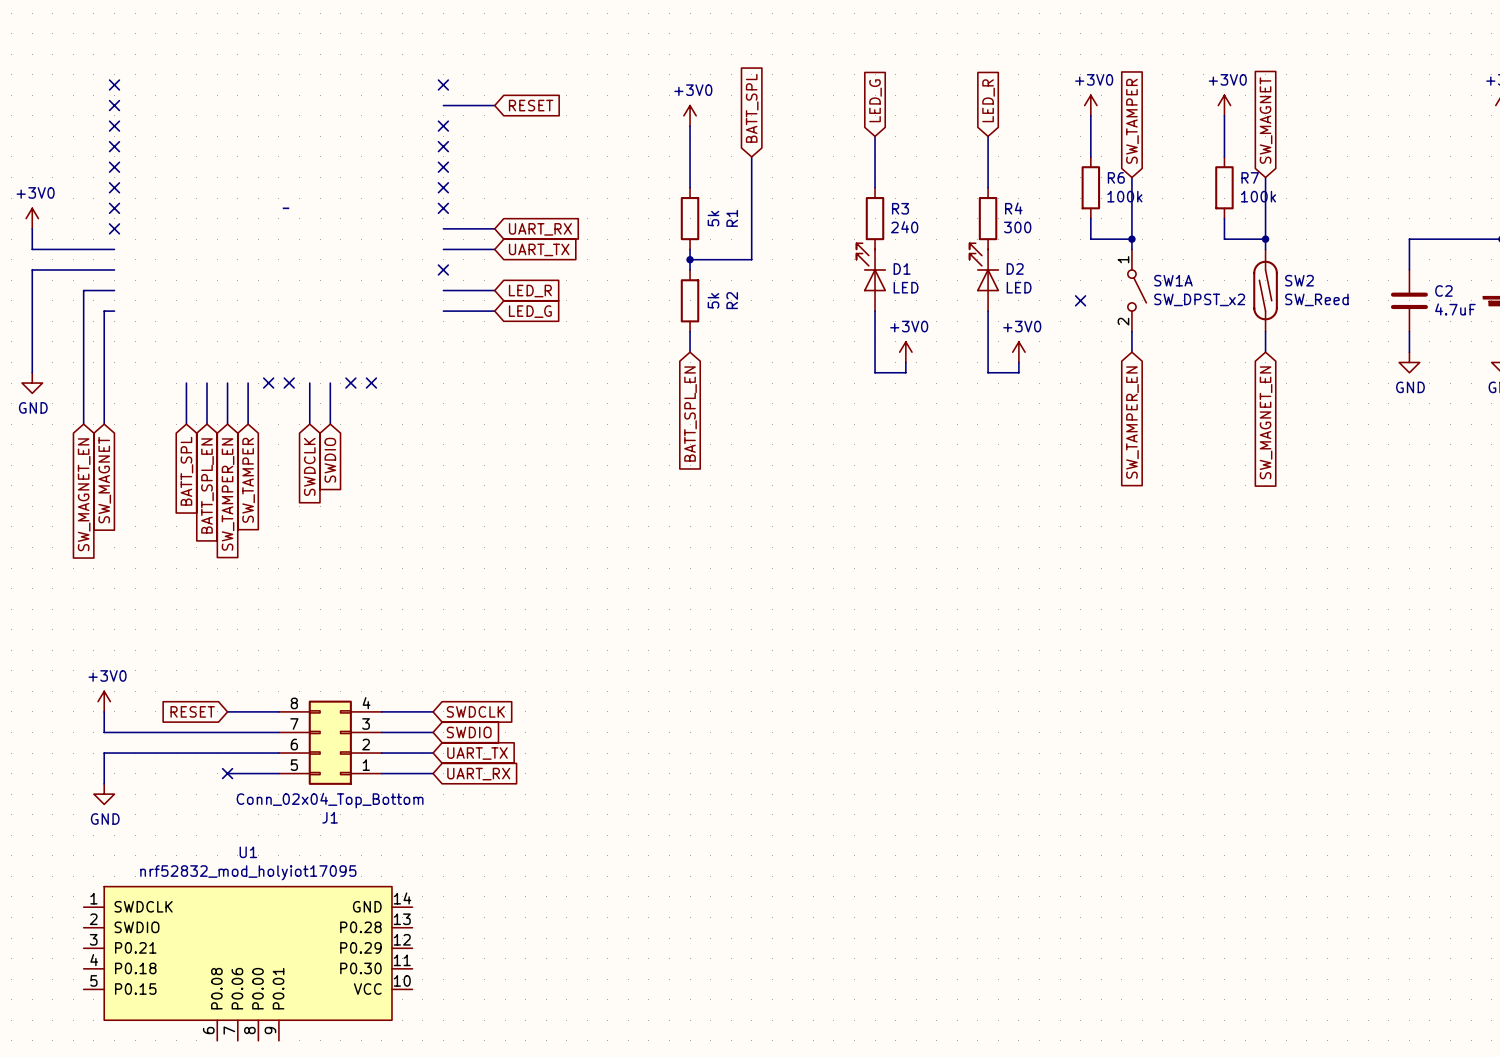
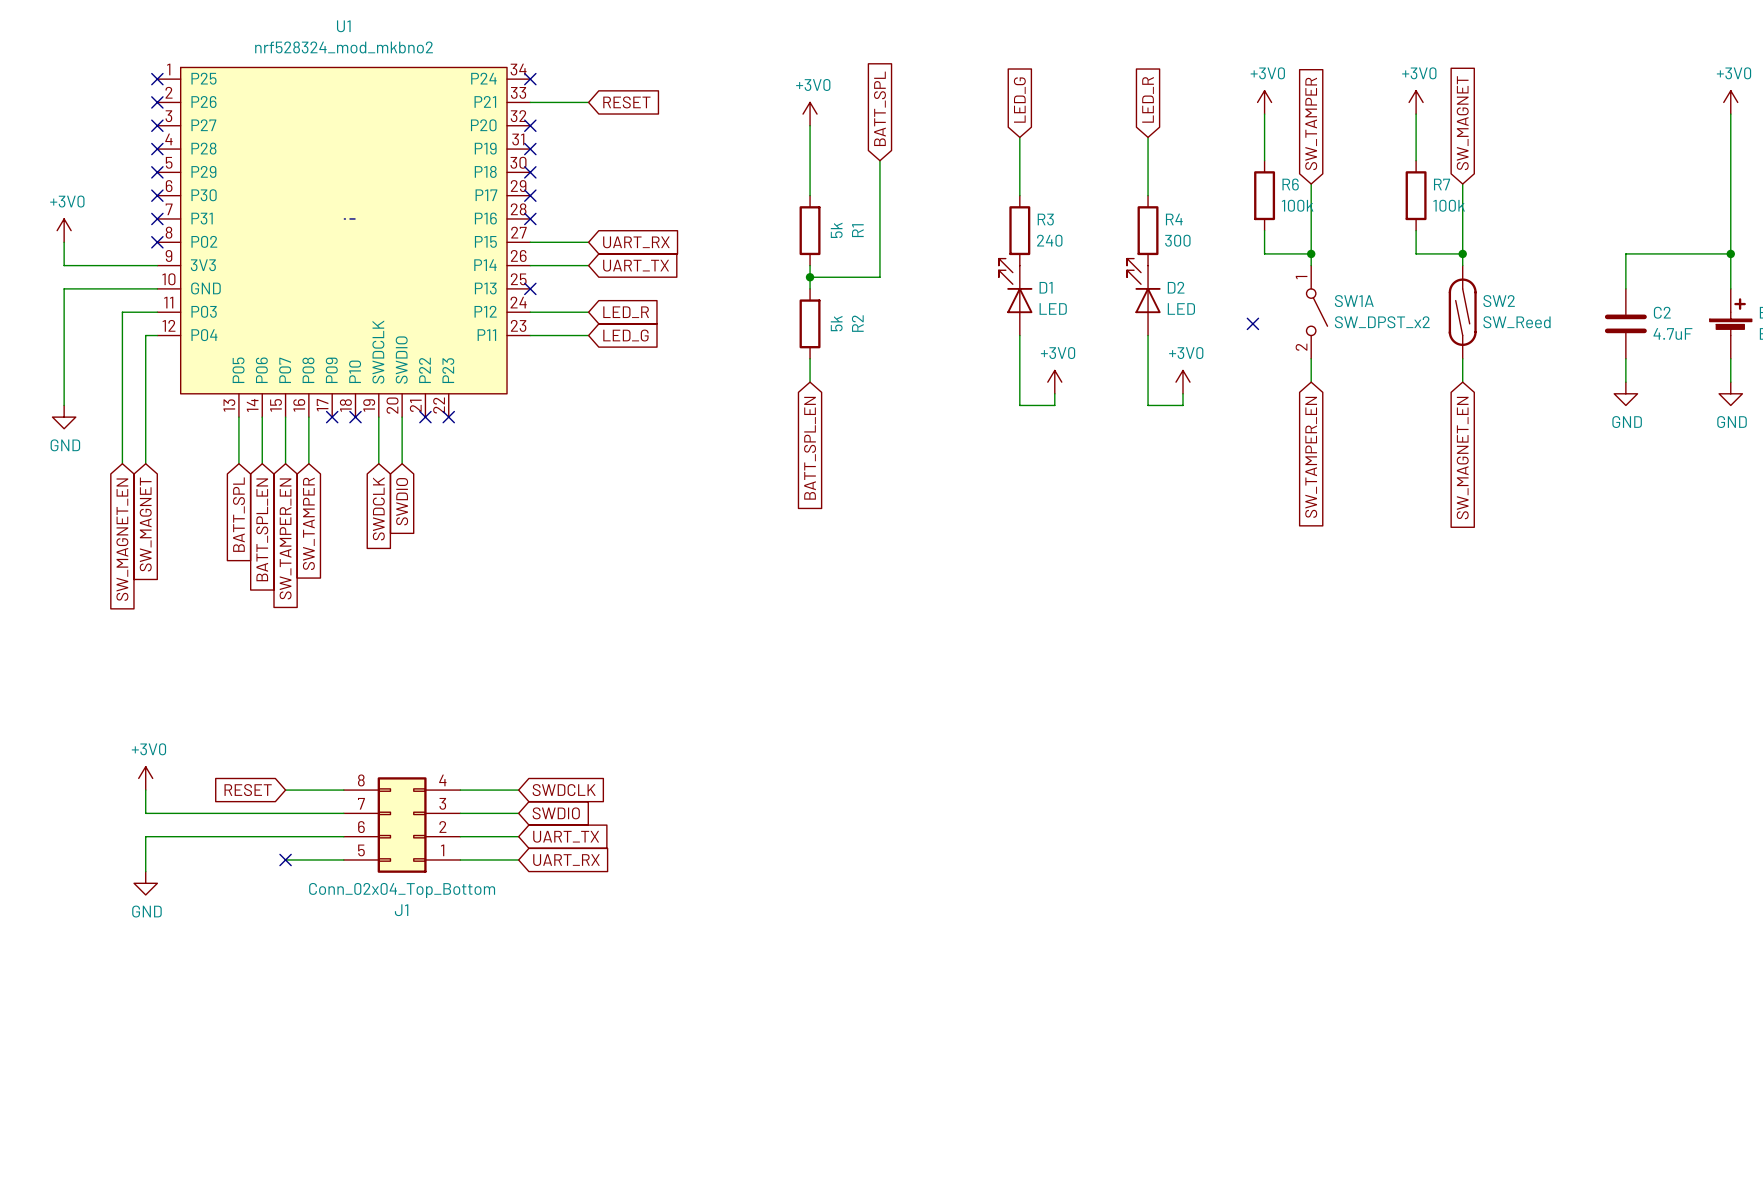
U1 name position: U1 (248, 852) -> U1 (343, 26)
U1 value: nrf52832_mod_holyiot17095 (248, 872) -> nrf528324_mod_mkbno2 (344, 47)
U1 symbol: [83, 886, 413, 1041] -> [157, 67, 531, 418]

